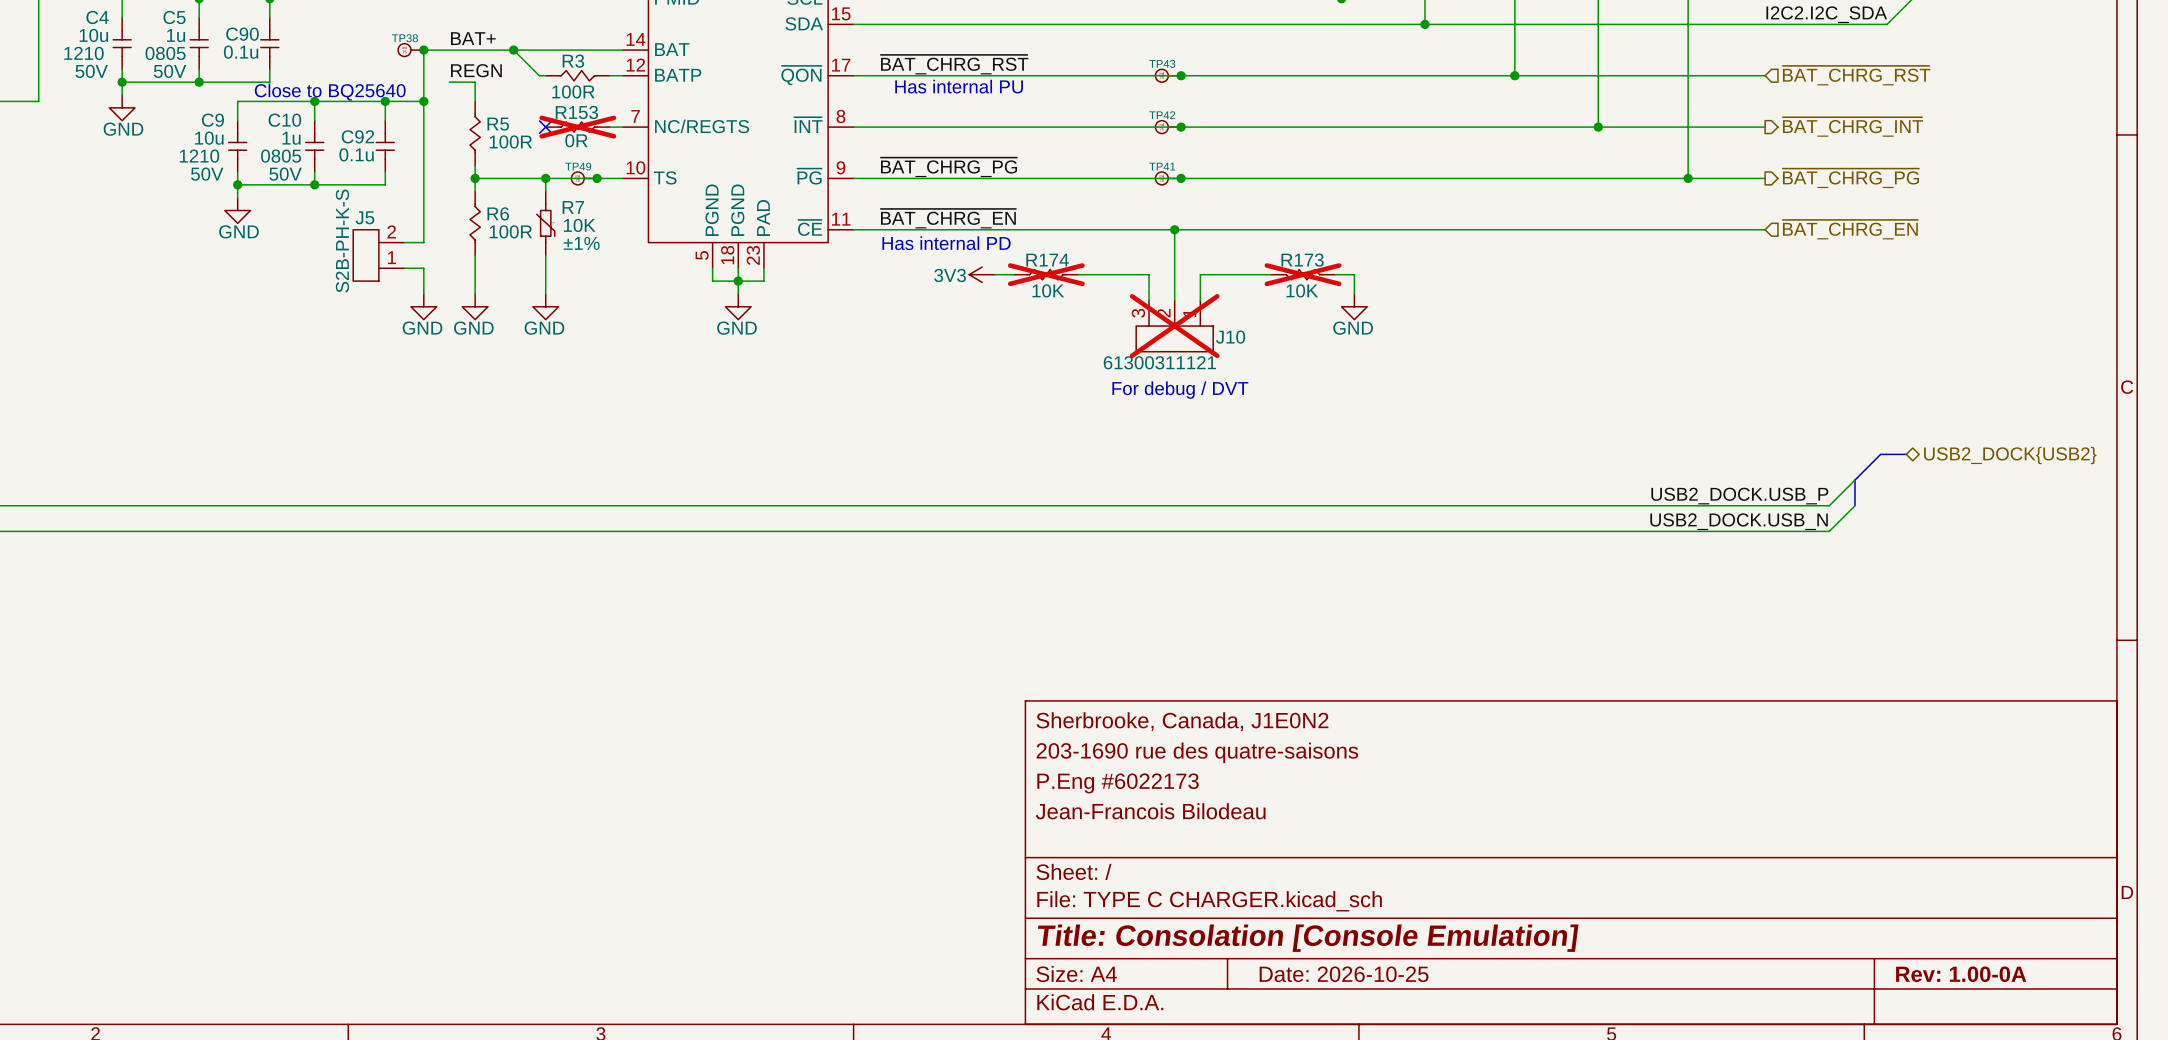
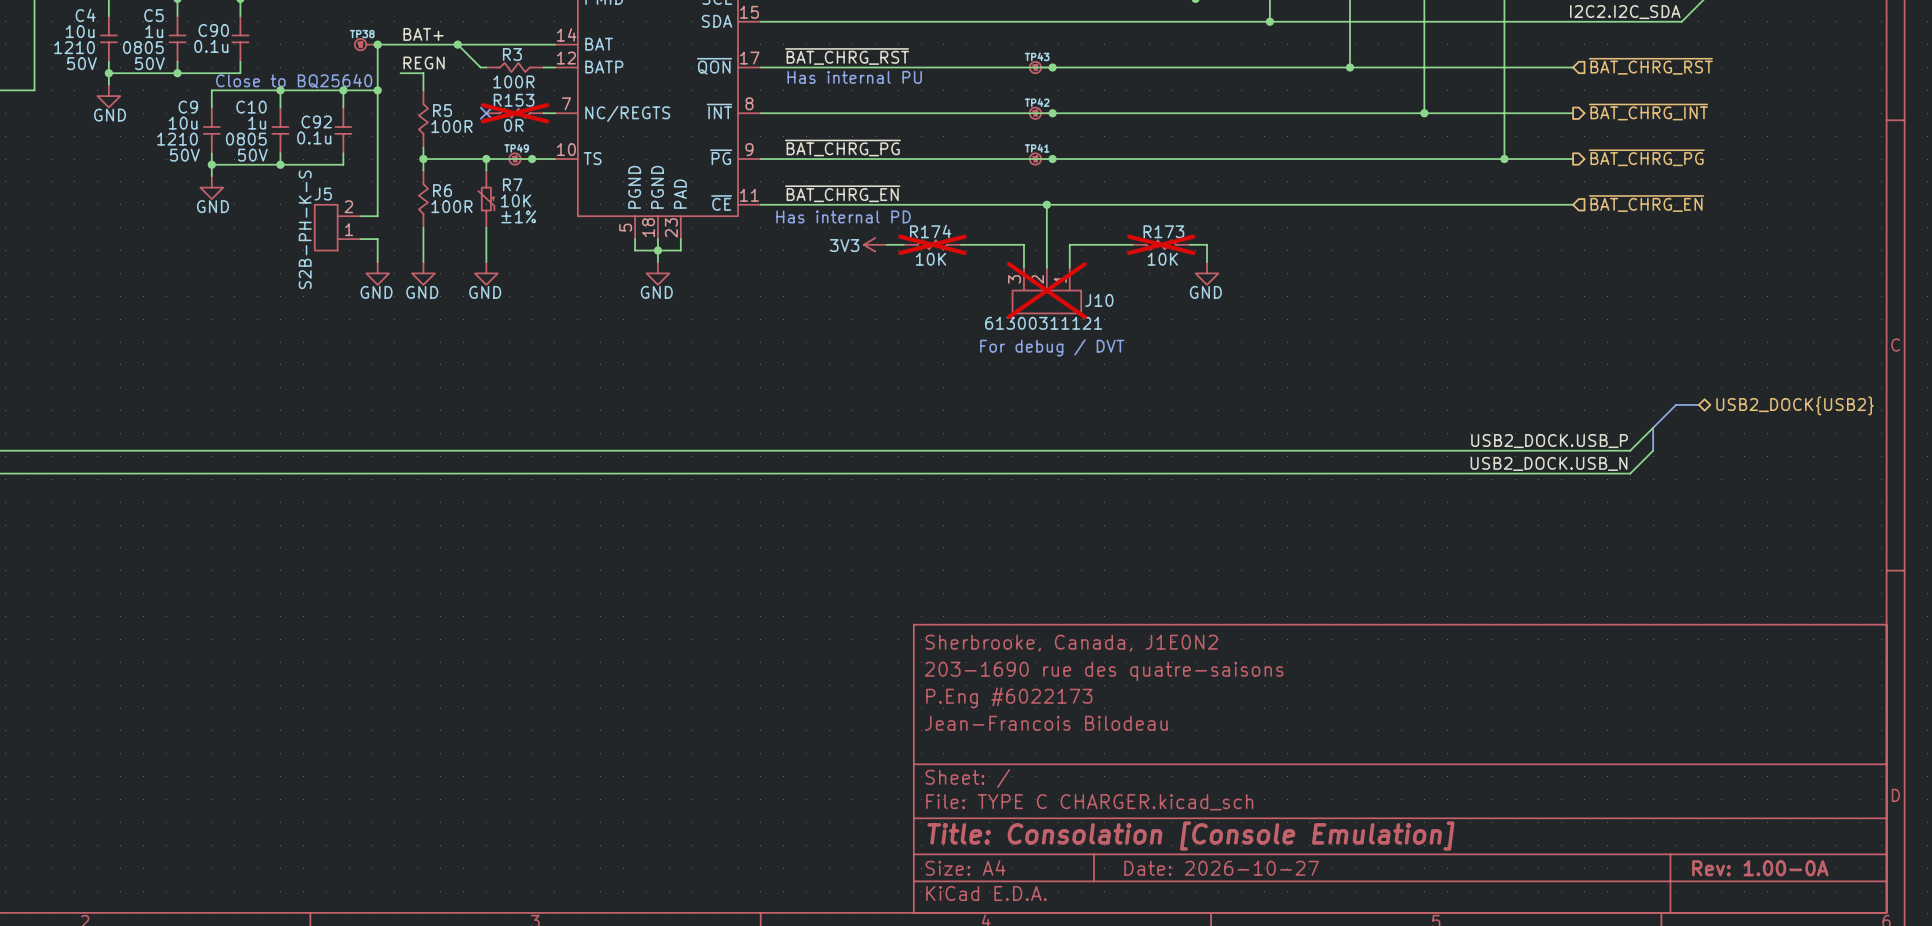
title block: Date: 2026-10-25 (1344, 974) -> Date: 2026-10-27 (1221, 868)

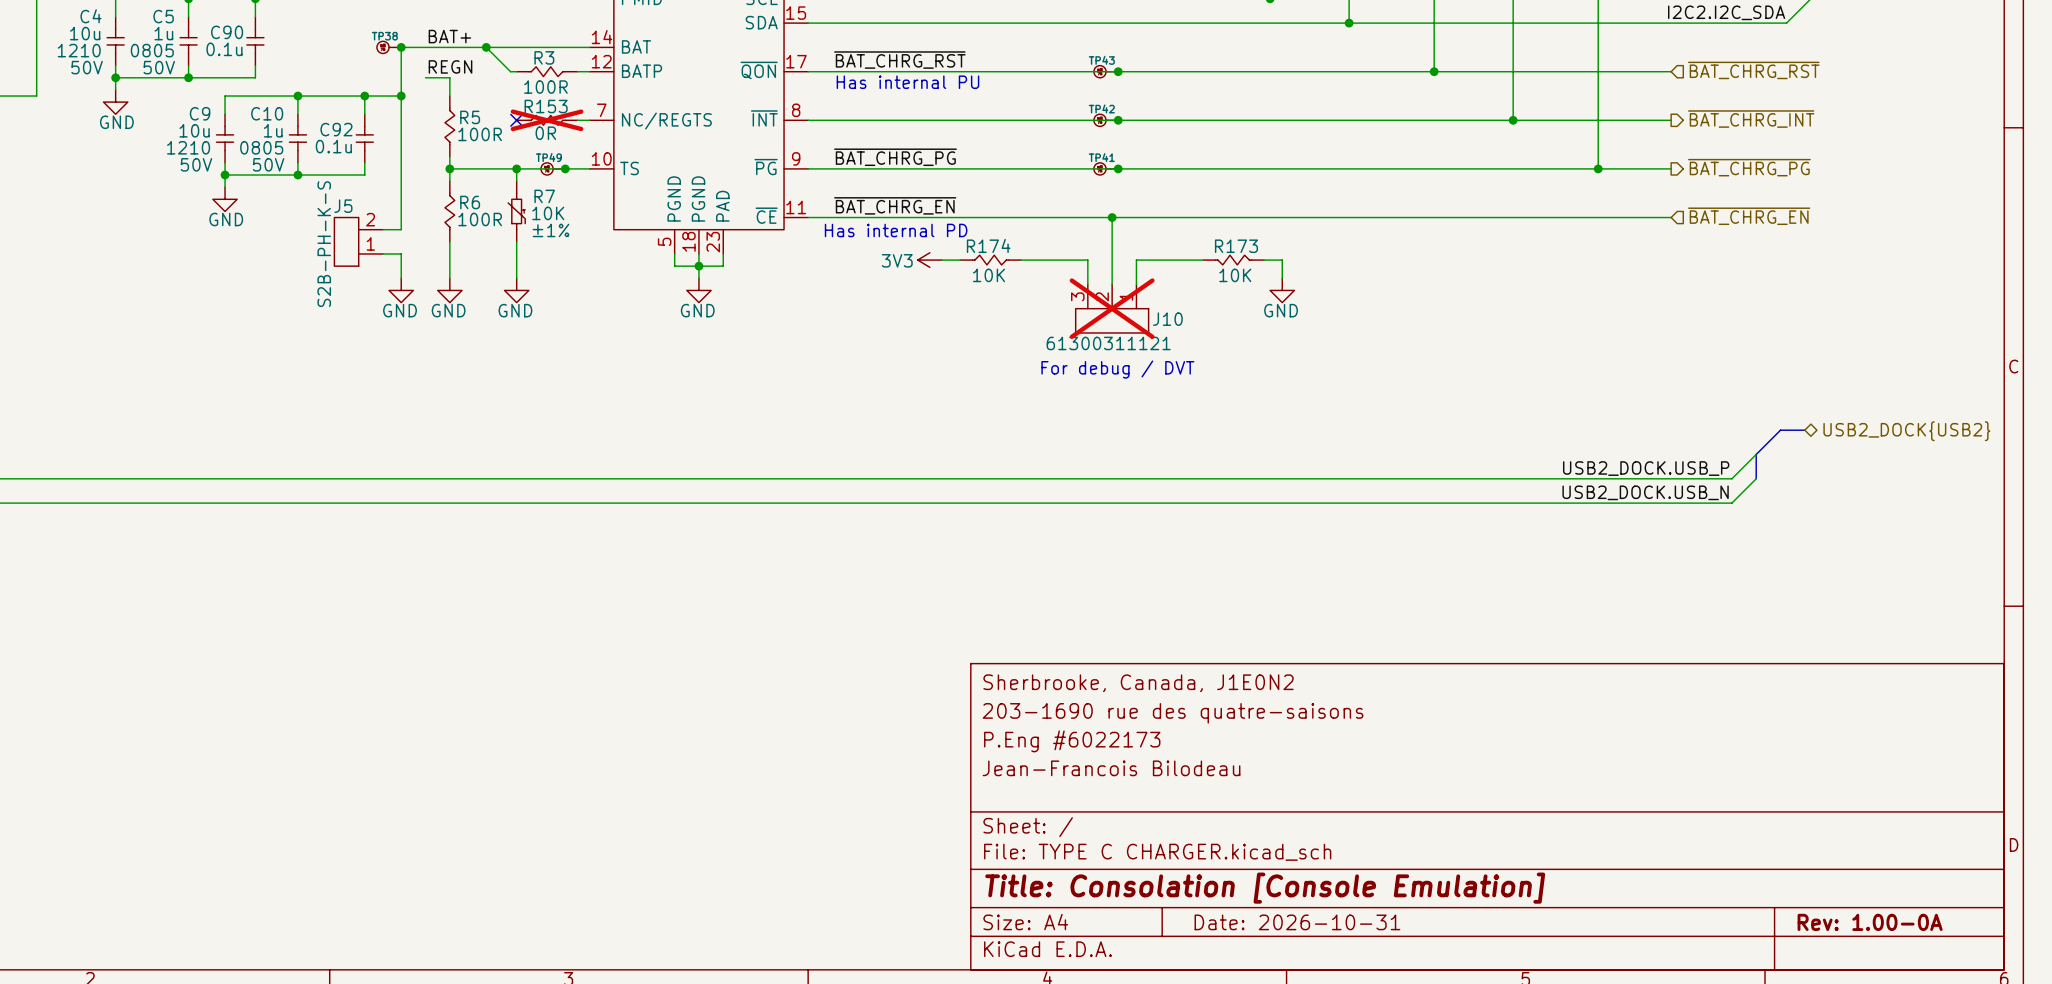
text: Close to BQ25640 (294, 81) -> none
R174 do-not-place cross: (932, 244) -> none
R173 do-not-place cross: (1161, 244) -> none
title block: Date: 2026-10-27 (1221, 868) -> Date: 2026-10-31 (1297, 922)

